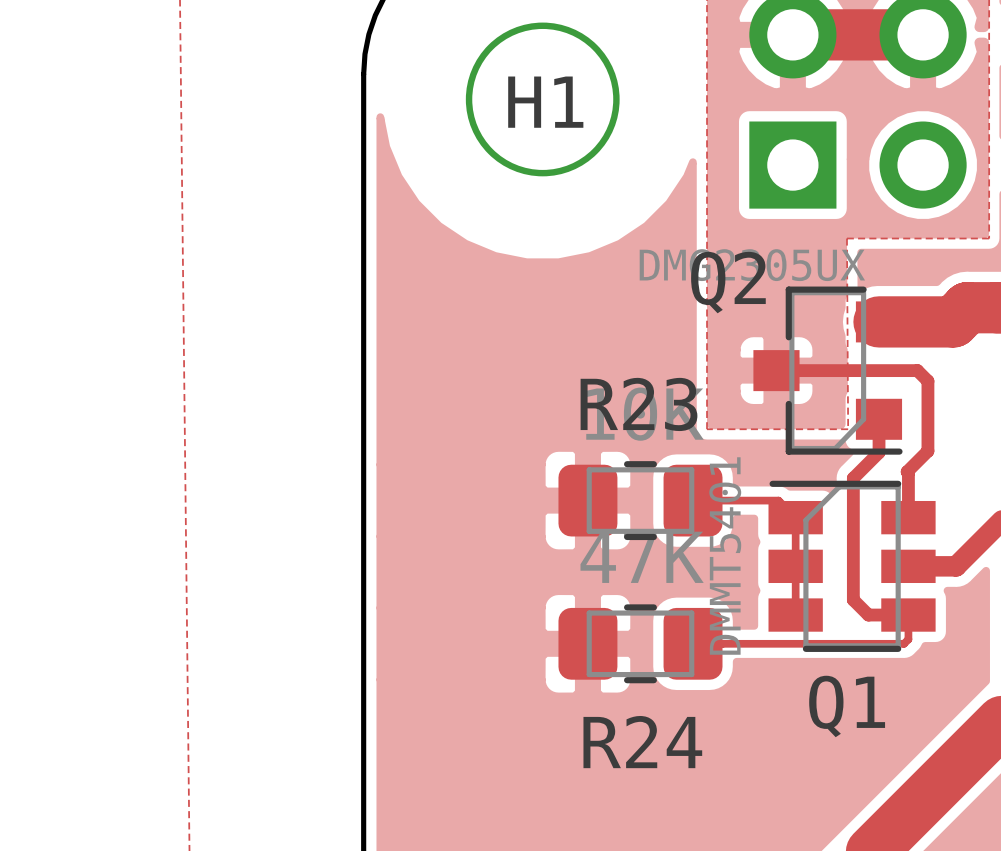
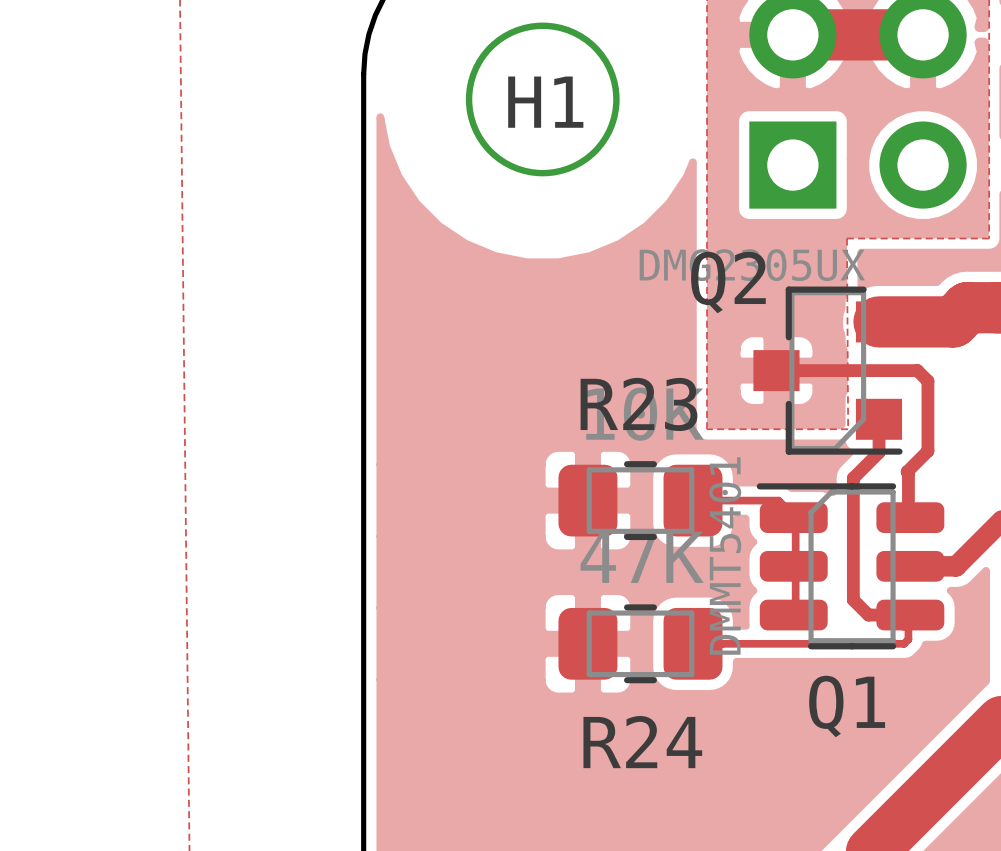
Q2 footprint: [768, 480, 936, 652] -> [756, 483, 945, 650]

